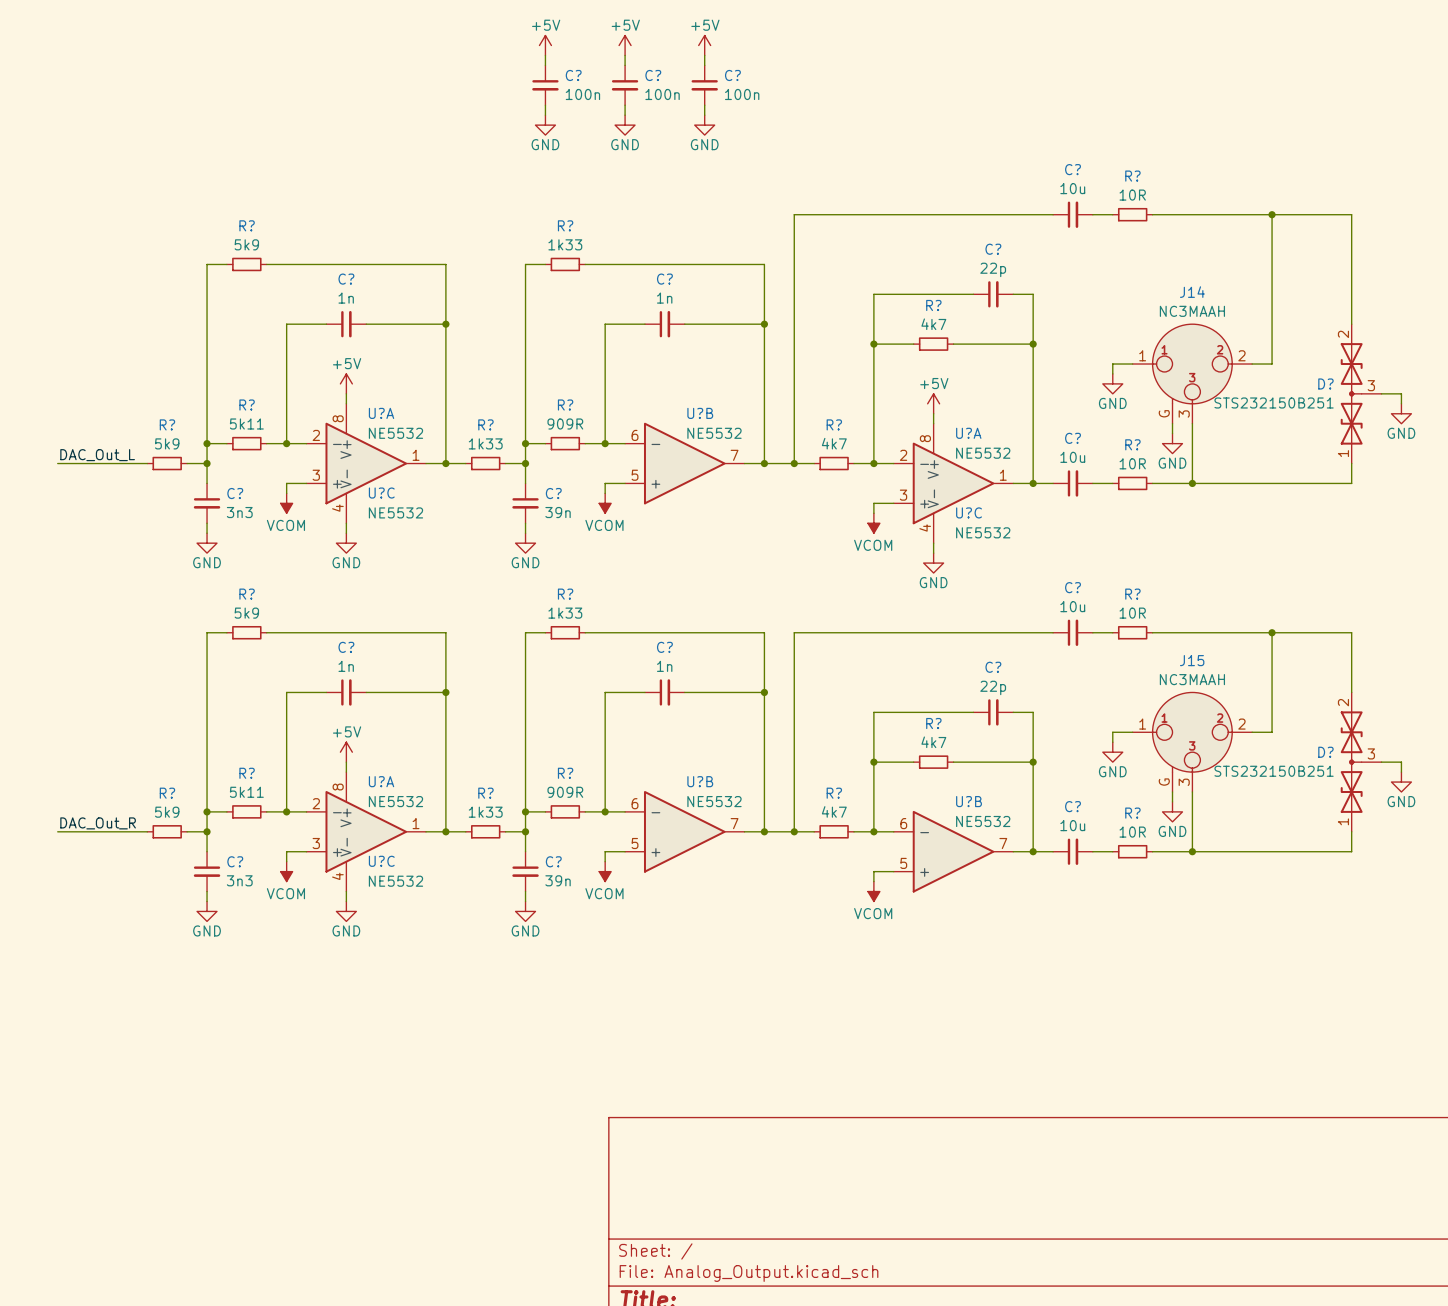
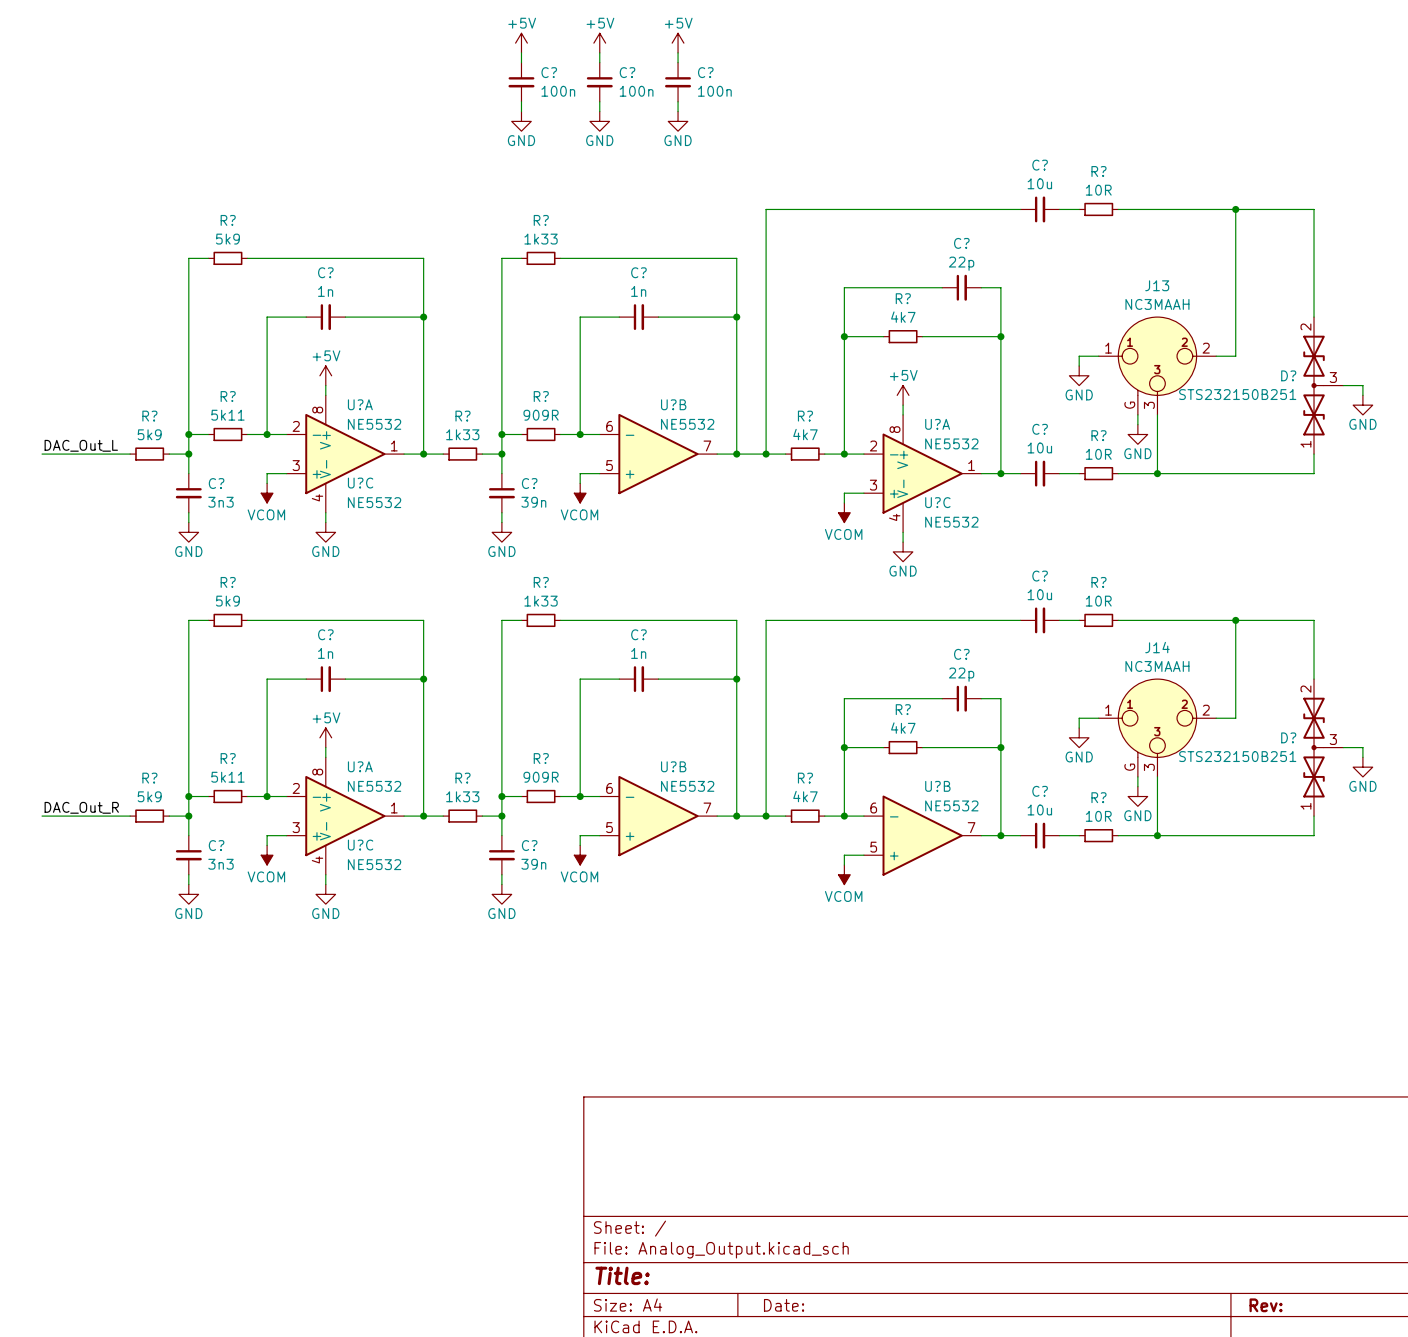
J14 name: J14 (1192, 292) -> J13 (1157, 285)
J15 name: J15 (1192, 660) -> J14 (1157, 647)

